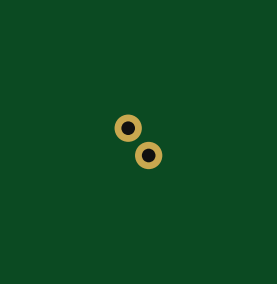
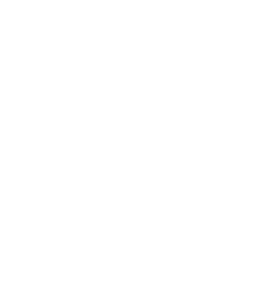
via: (128, 128) -> none
via: (148, 155) -> none

